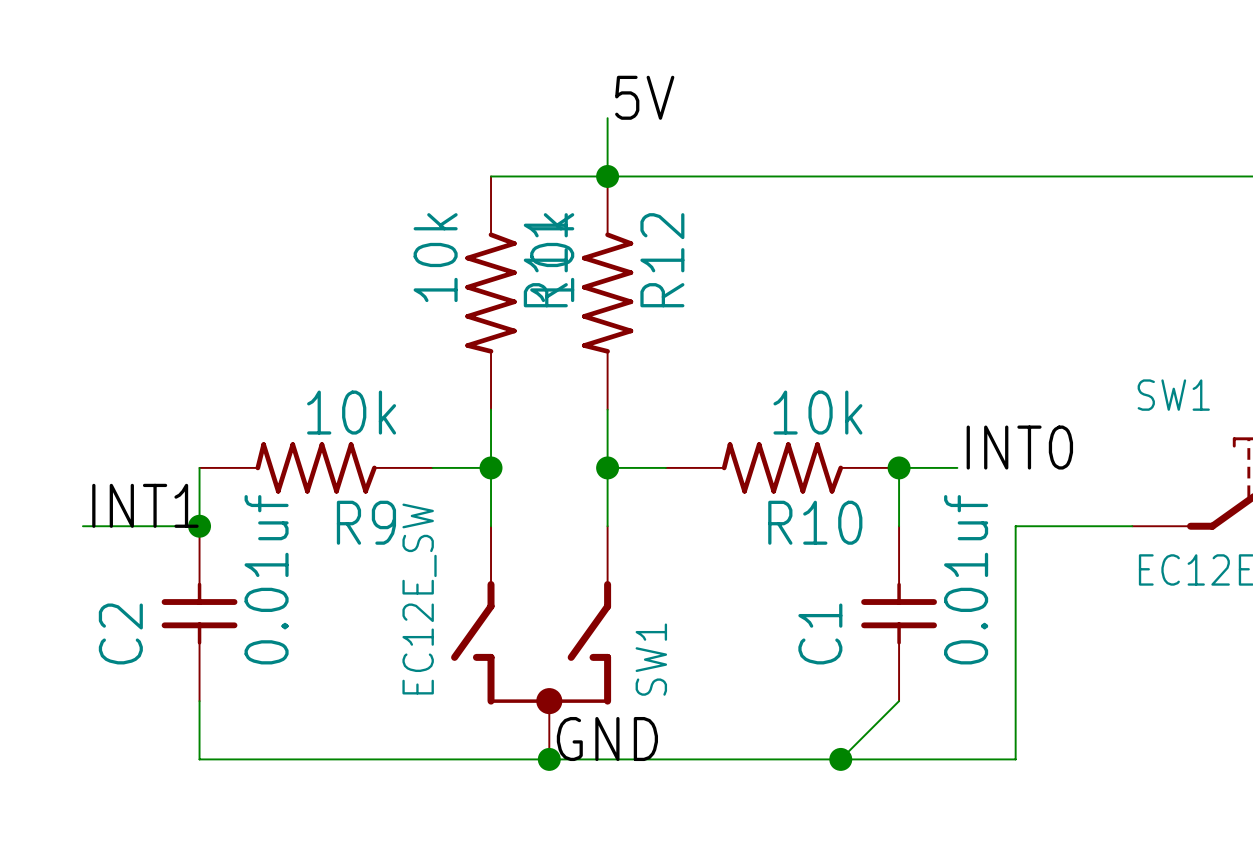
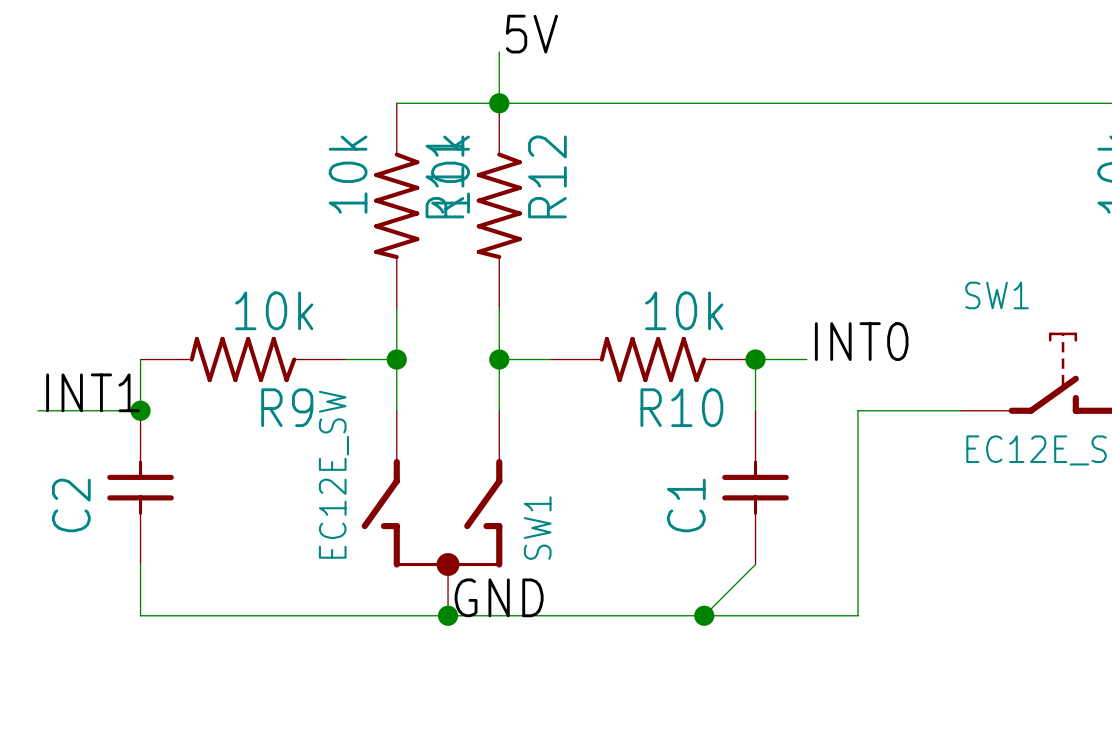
C2 value: 0.01uf (266, 579) -> none
C1 value: 0.01uf (966, 579) -> none

